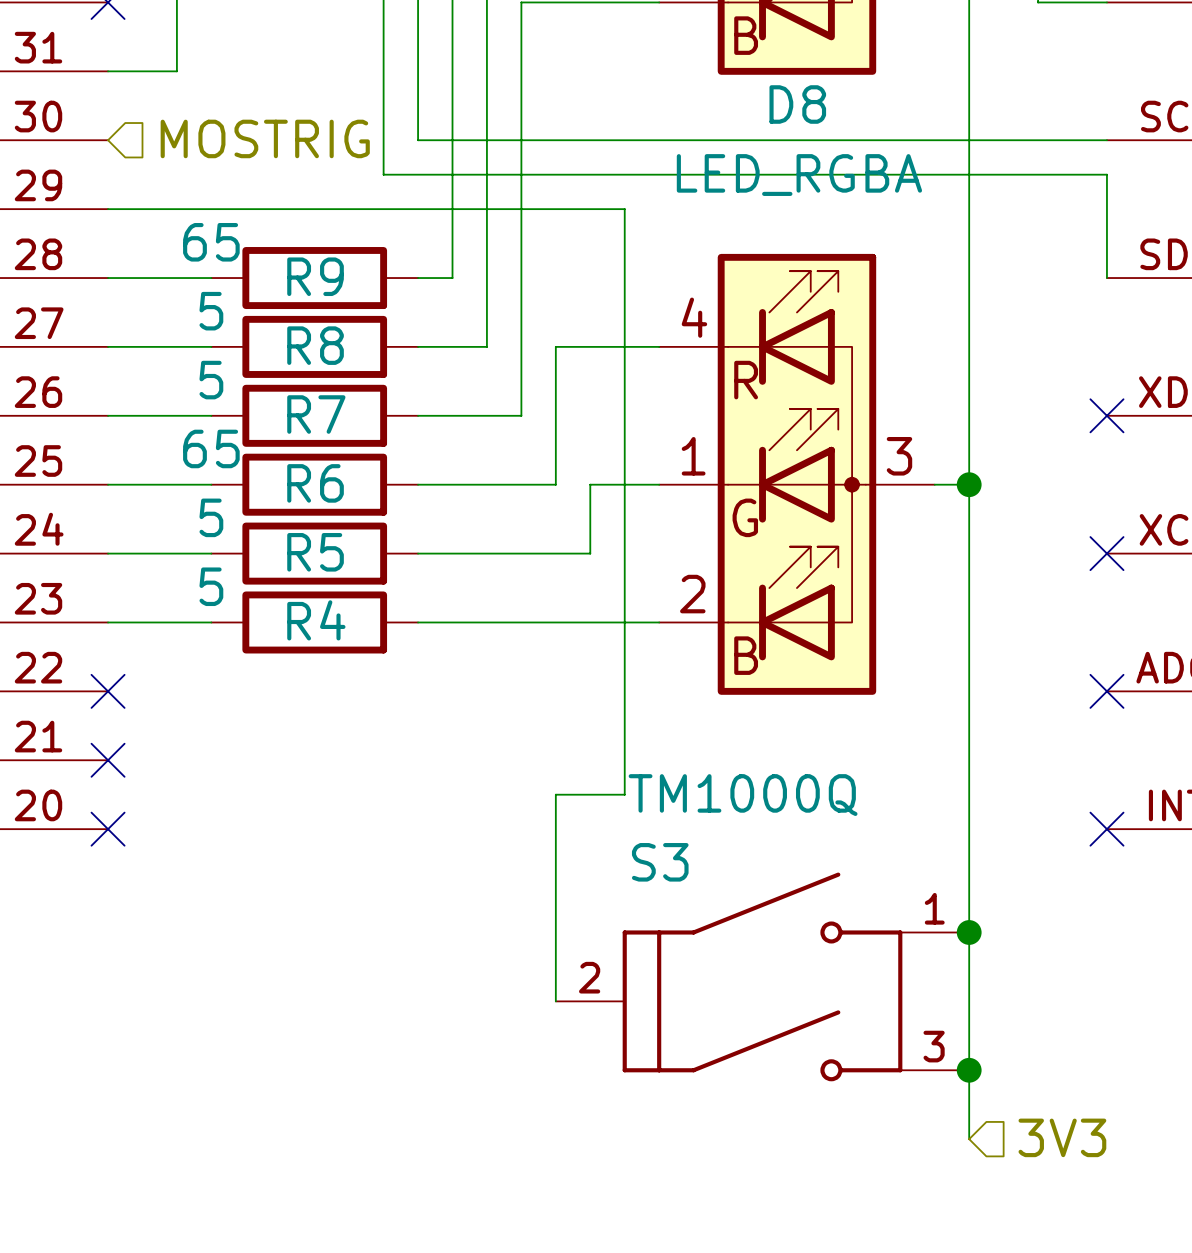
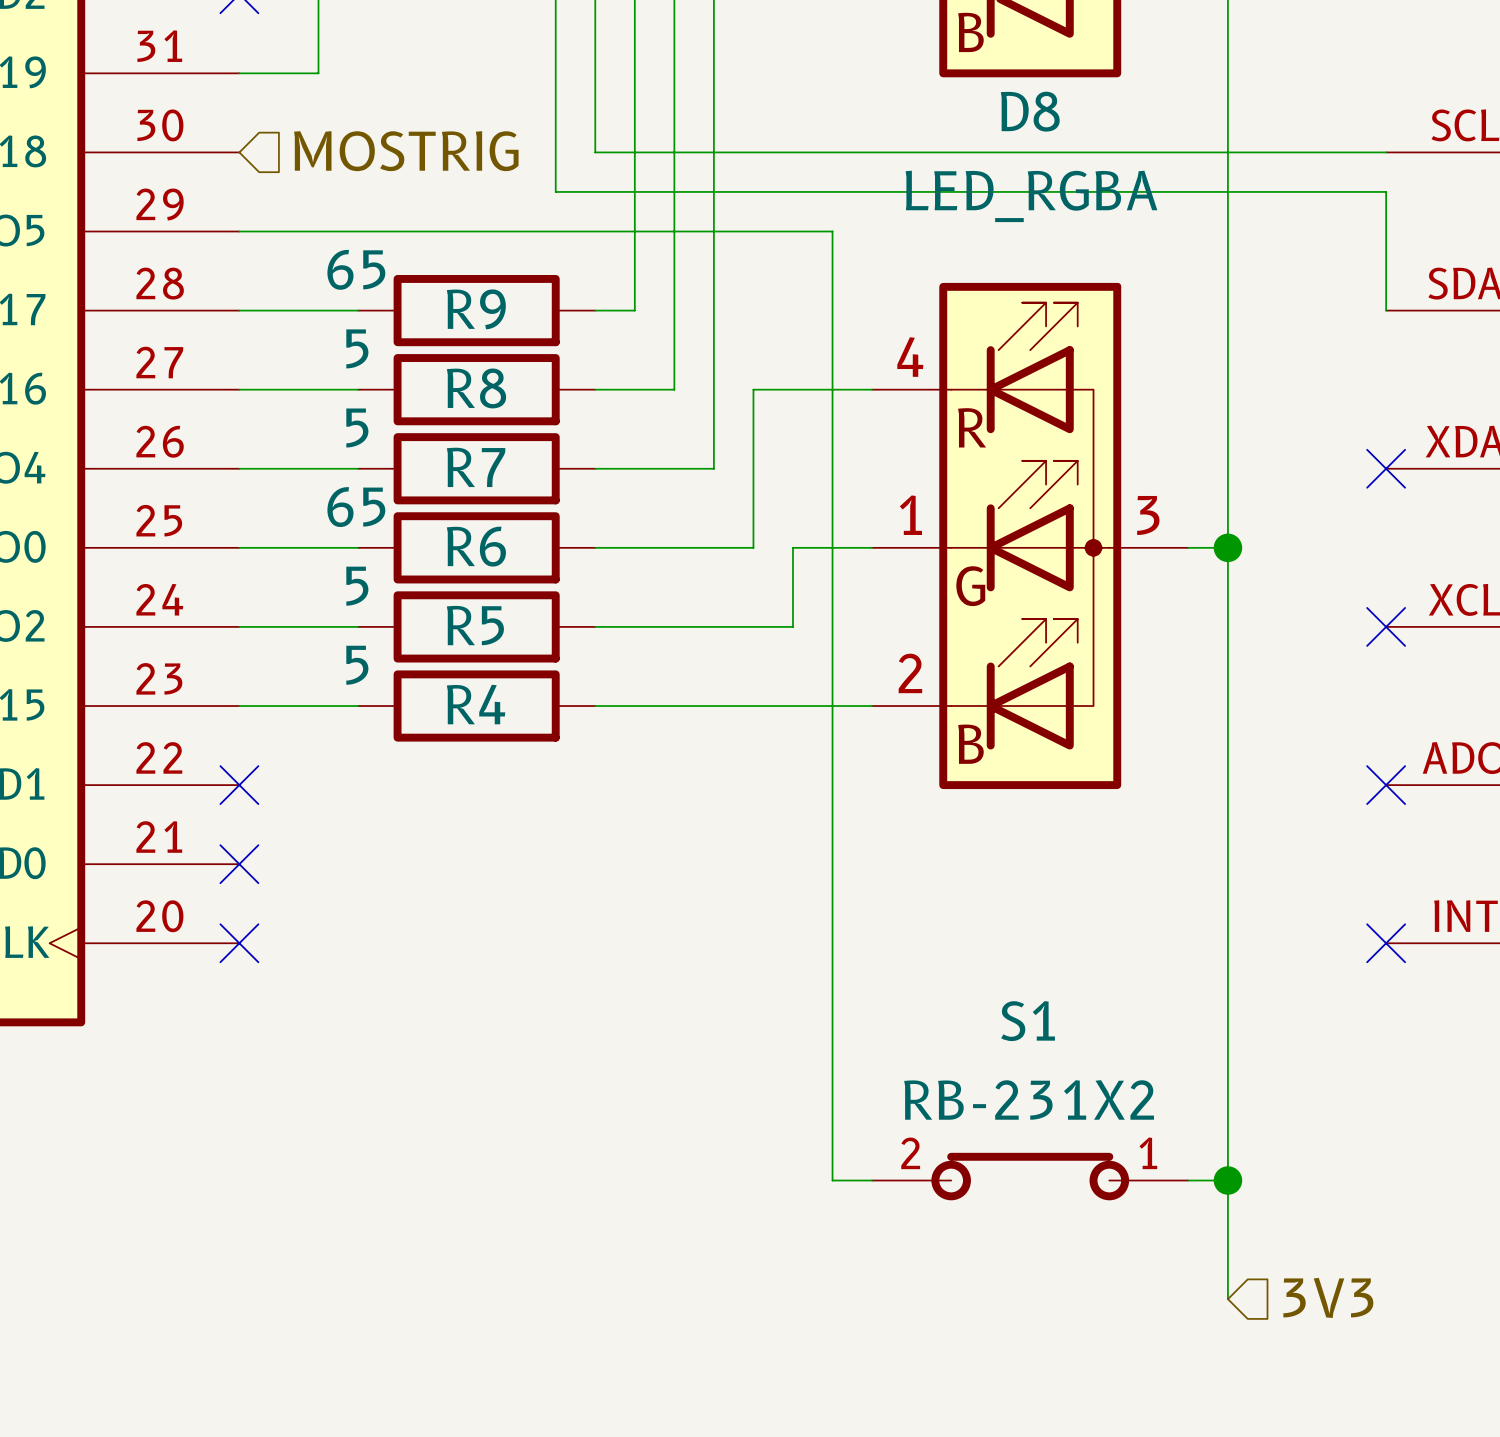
wire: (624, 794) (555, 794) (555, 1001) -> (832, 903) (832, 1180) (872, 1180)
junction: (969, 932) -> none
S3: TM1000Q (762, 976) -> none
S1: none -> RB-231X2 (1030, 1176)
wire: none -> (1188, 1180) (1227, 1180)
junction position: (969, 1070) -> (1227, 1180)

